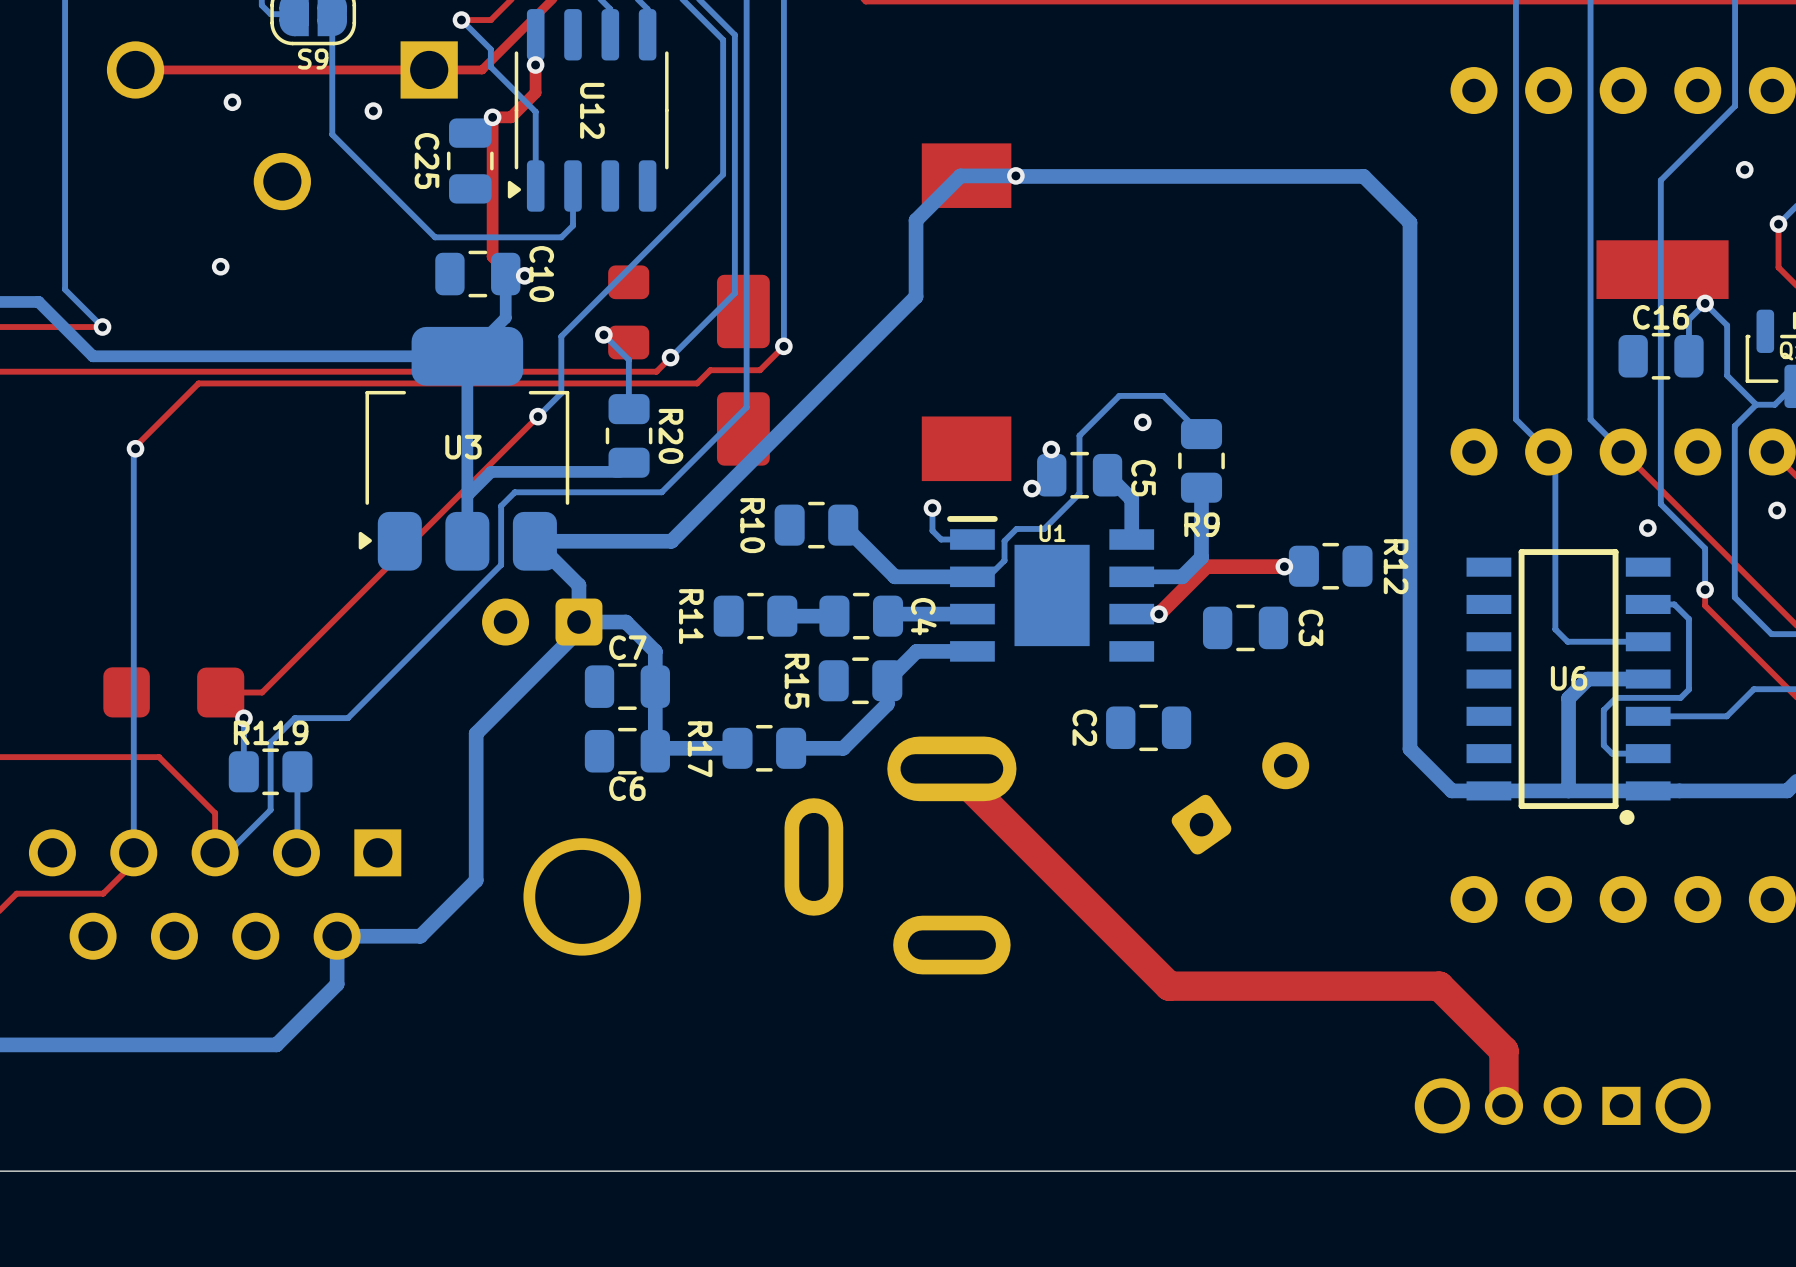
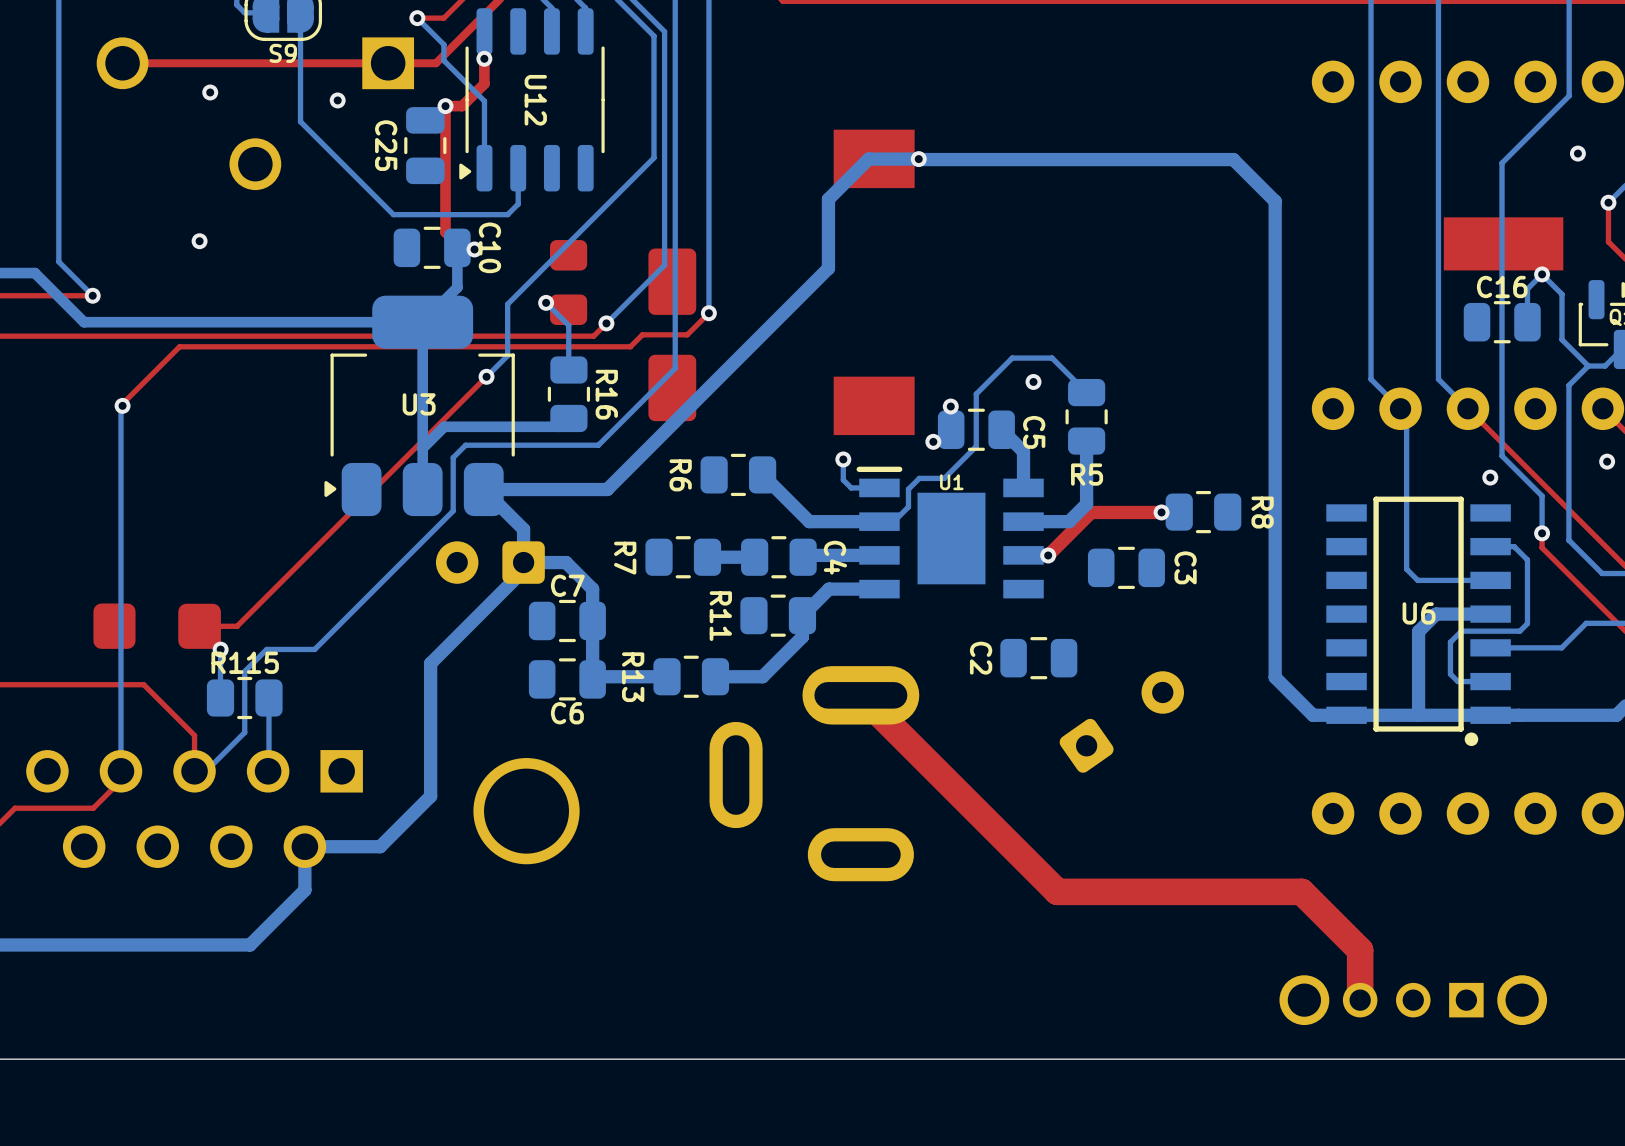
R20 name: R20 (670, 436) -> R16 (606, 394)
R9 name: R9 (1201, 524) -> R5 (1087, 474)
R10 name: R10 (752, 525) -> R6 (680, 475)
R12 name: R12 (1396, 566) -> R8 (1262, 512)
R11 name: R11 (691, 616) -> R7 (625, 558)
R15 name: R15 (797, 681) -> R11 (720, 616)
R119 name: R119 (271, 732) -> R115 (245, 662)
R17 name: R17 (700, 749) -> R13 (633, 677)

